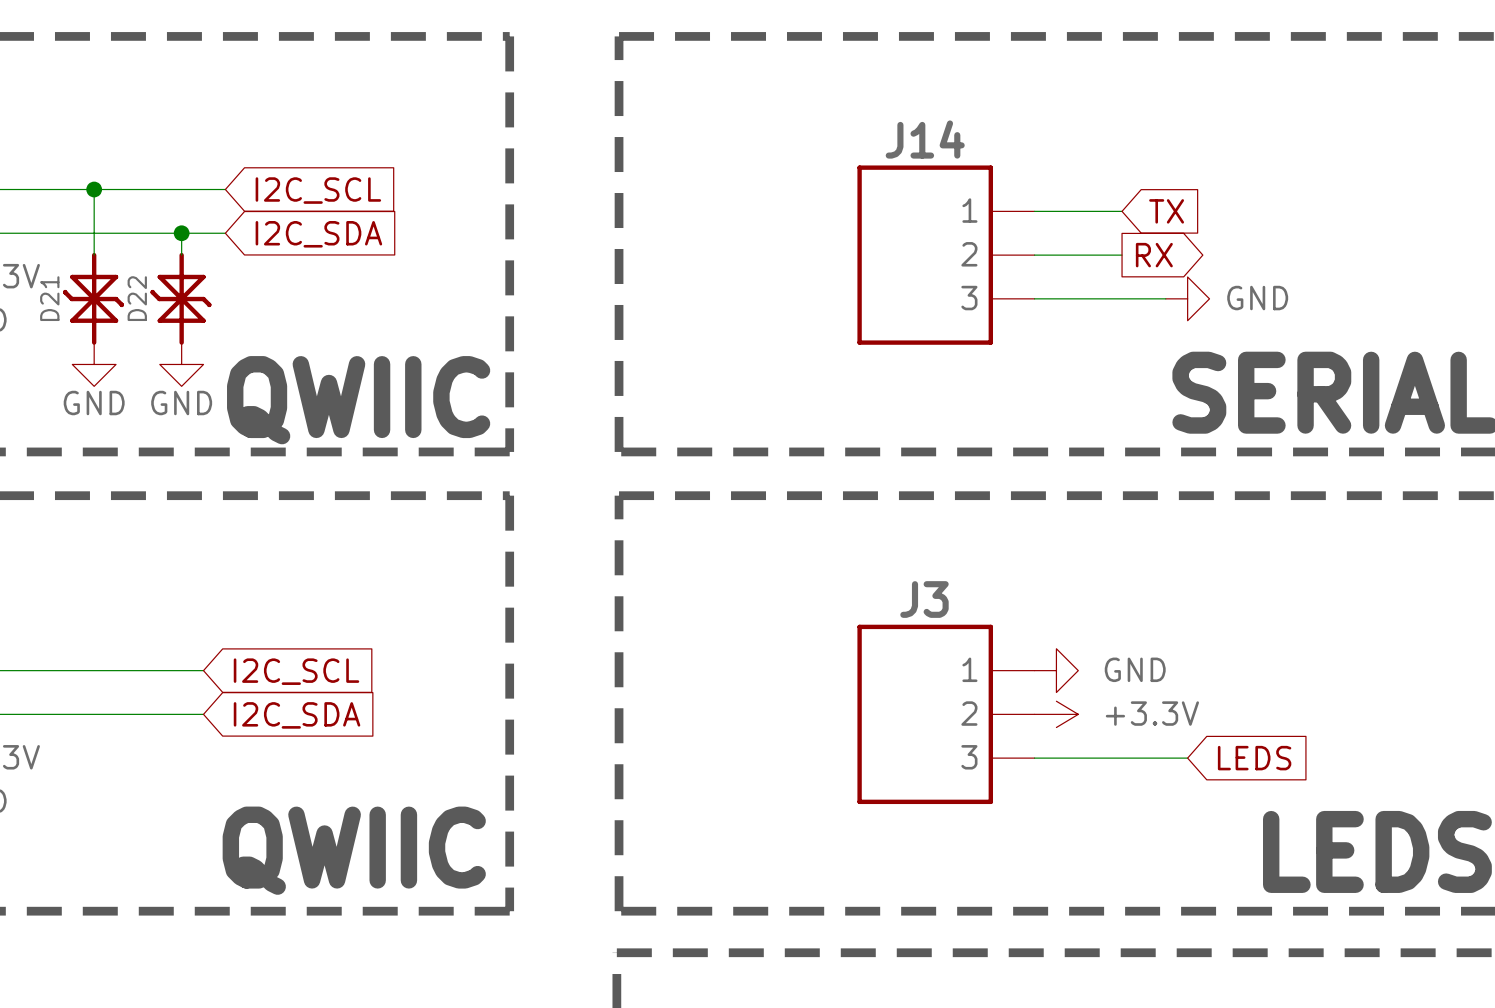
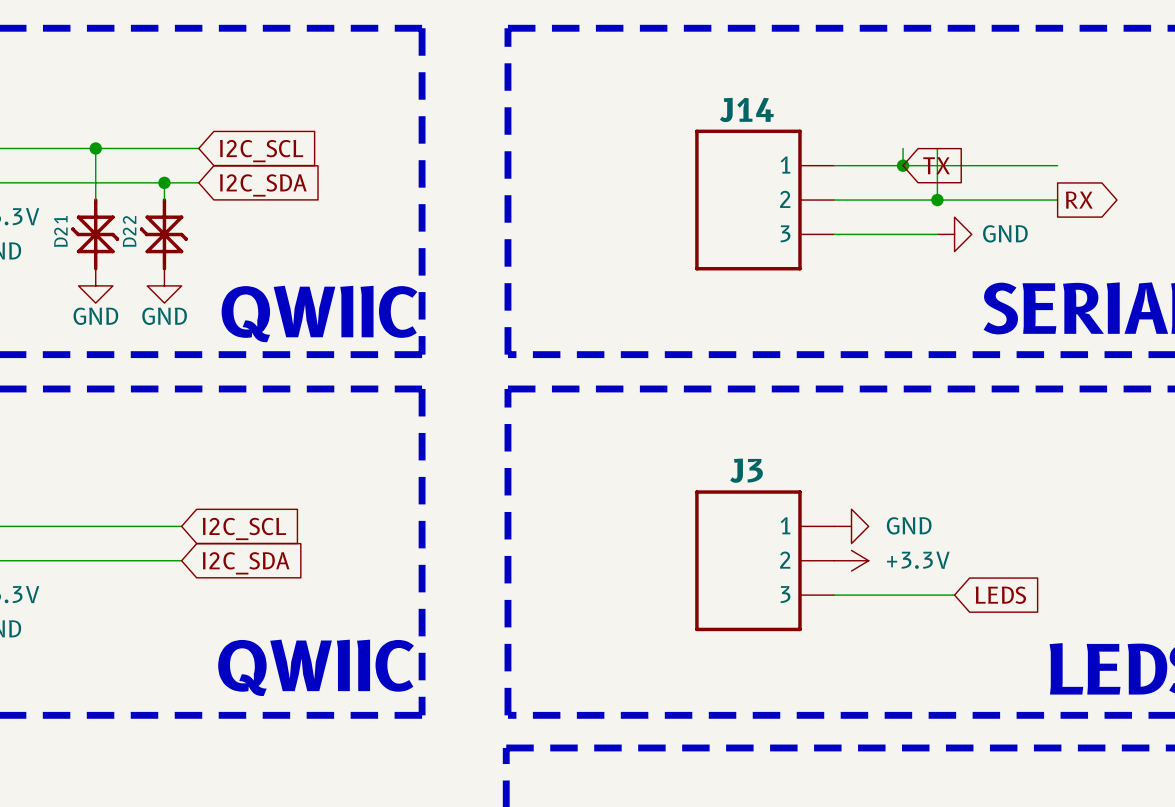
wire: none -> (903, 148) (903, 165) (1057, 165)
wire: none -> (937, 148) (937, 200)
junction: none -> (903, 165)
wire: none -> (903, 200) (1057, 200)
global label position: RX (1154, 255) -> RX (1079, 200)
junction: none -> (937, 200)

